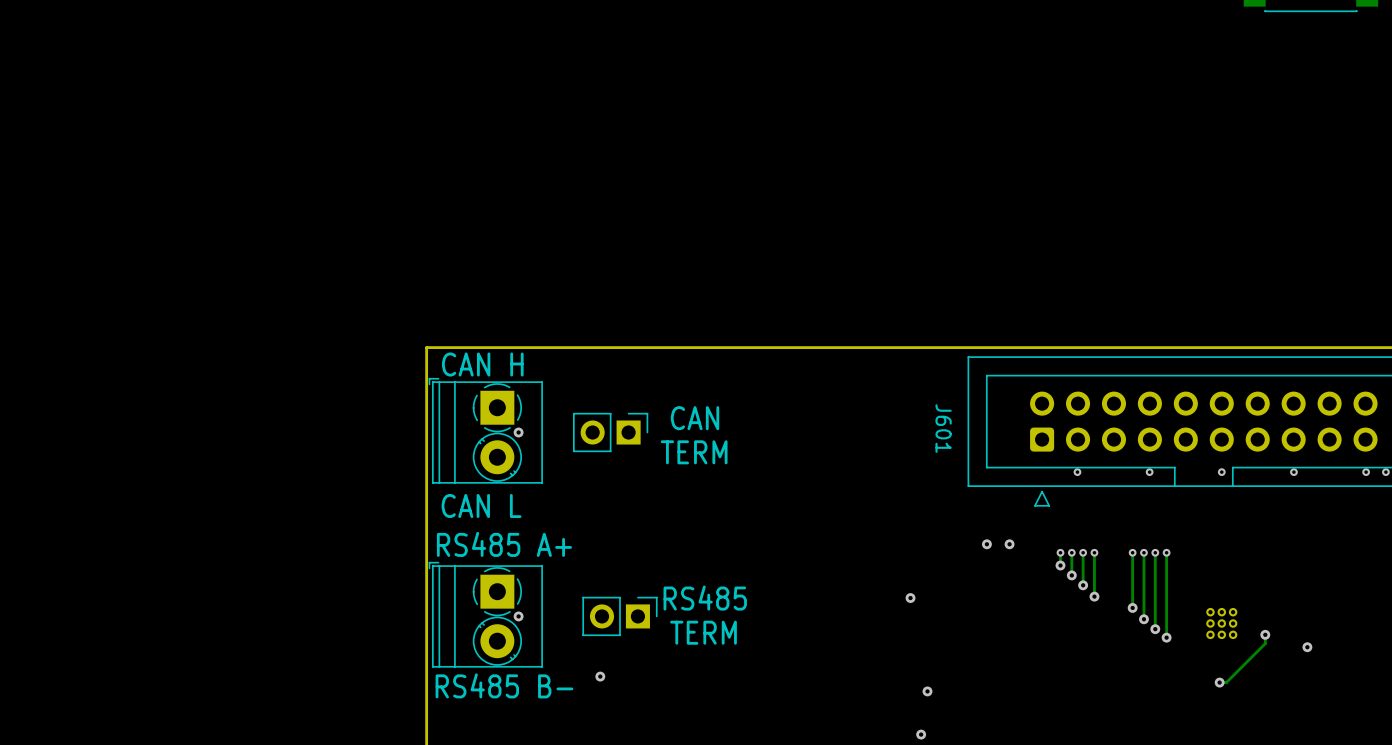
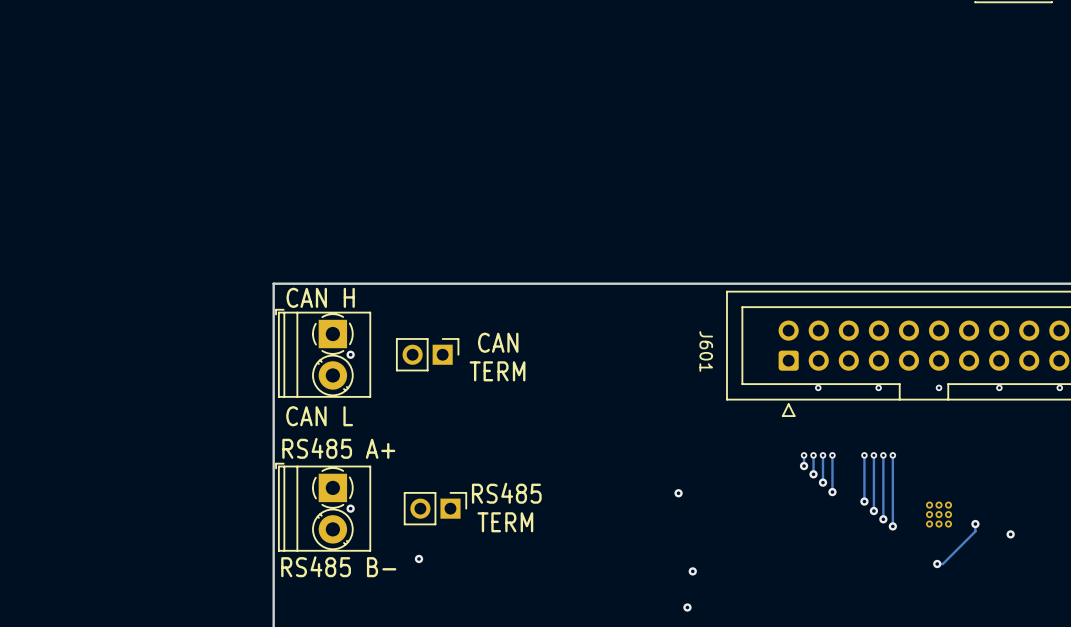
via: (986, 544) -> none
via: (1009, 544) -> none

